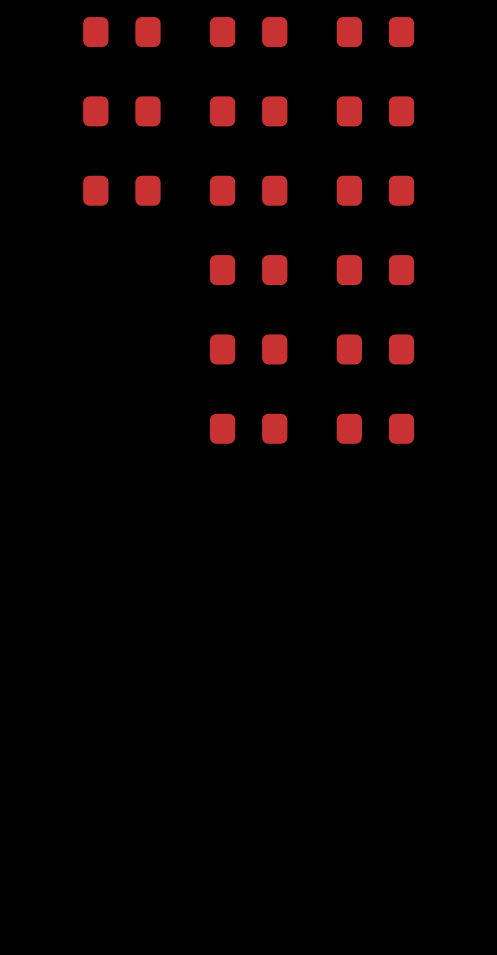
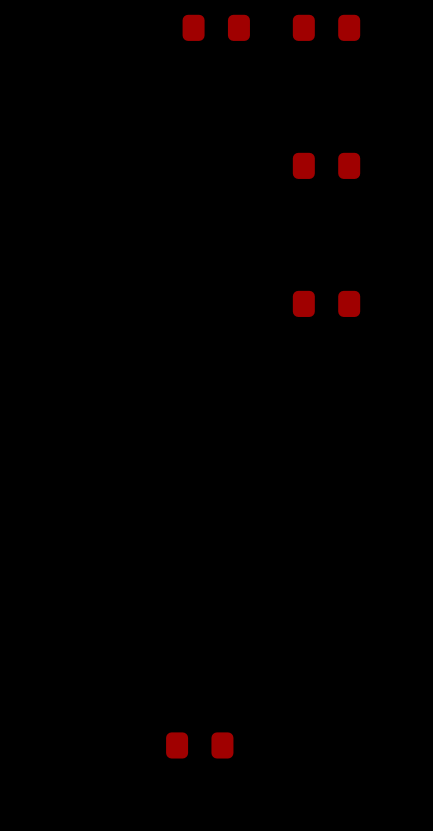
part: (121, 32) -> none
part: (121, 111) -> none
part: (248, 111) -> none
part: (375, 111) -> none
part: (121, 190) -> none
part: (248, 190) -> none
part: (248, 270) -> none
part: (375, 270) -> none
part: (248, 349) -> none
part: (248, 428) -> none
part: (375, 428) -> none
part: none -> (199, 745)

